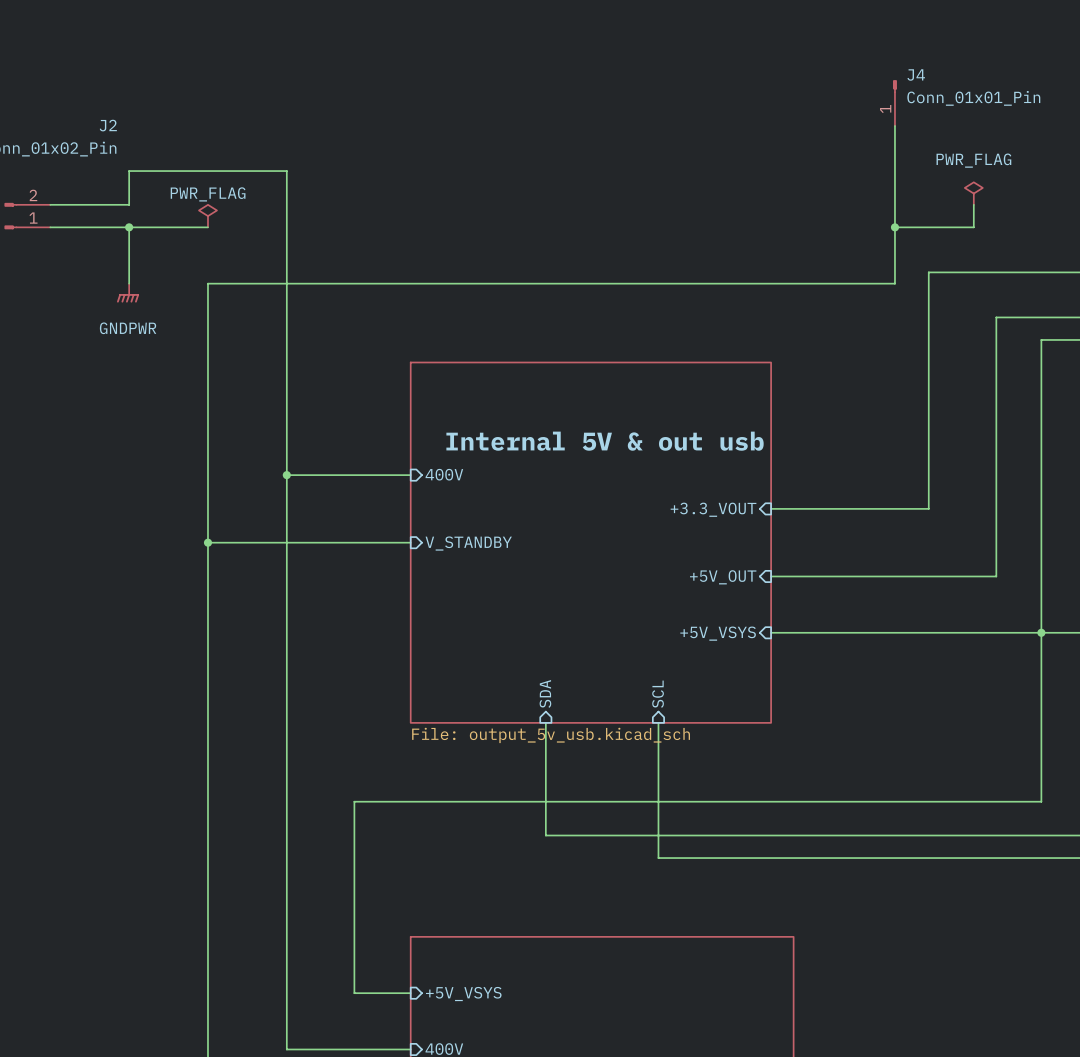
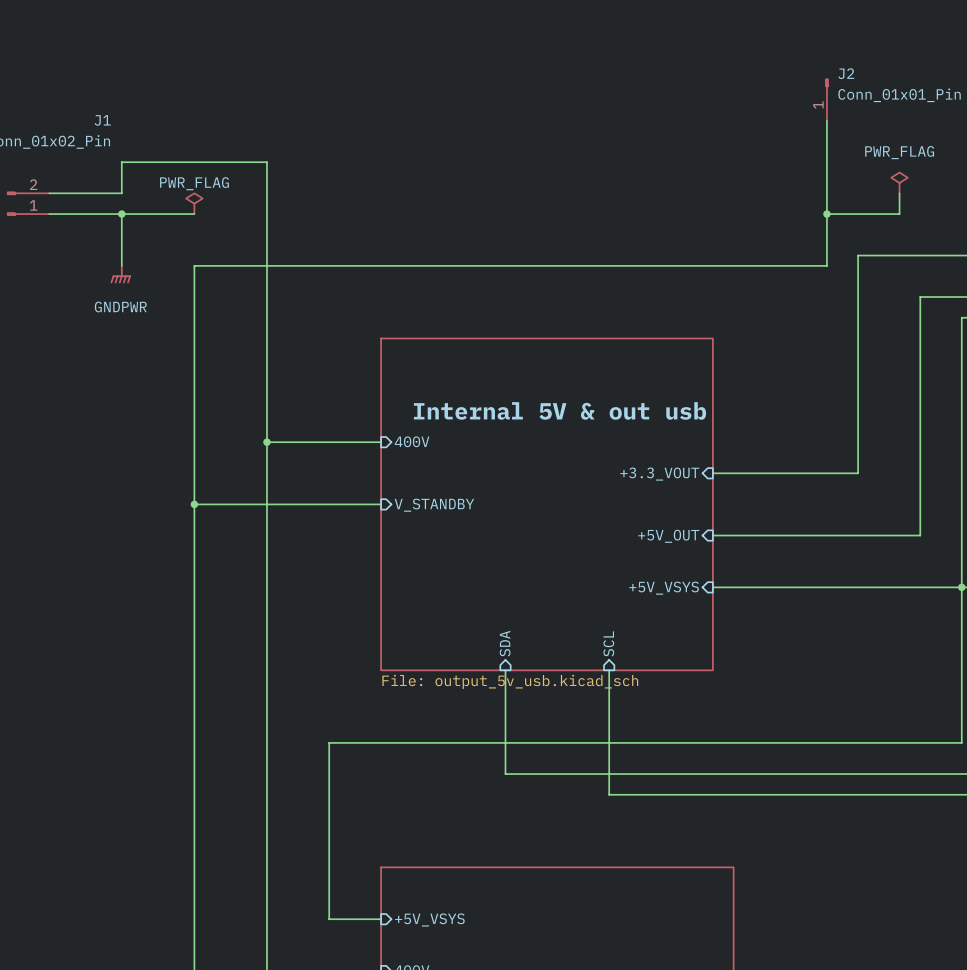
J4 name: J4 (916, 74) -> J2 (846, 73)
J2 name: J2 (108, 125) -> J1 (102, 120)

